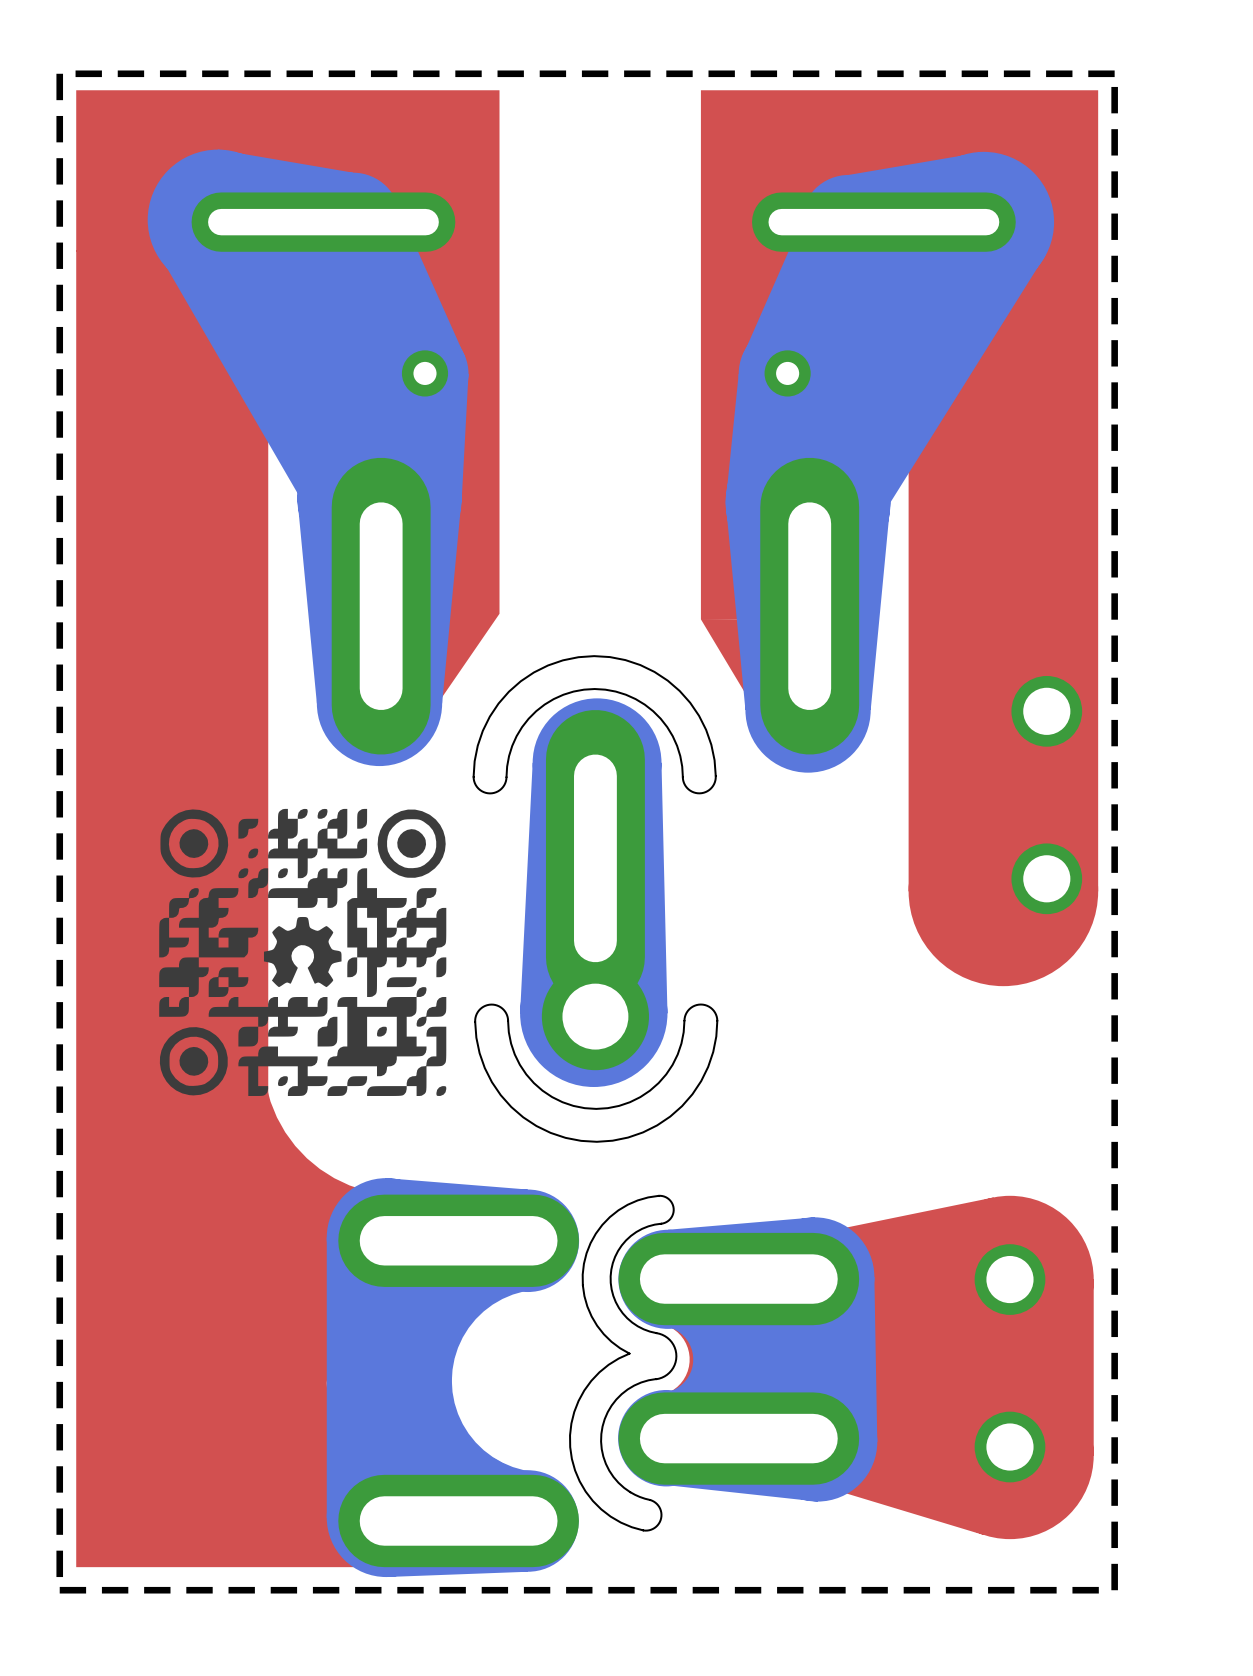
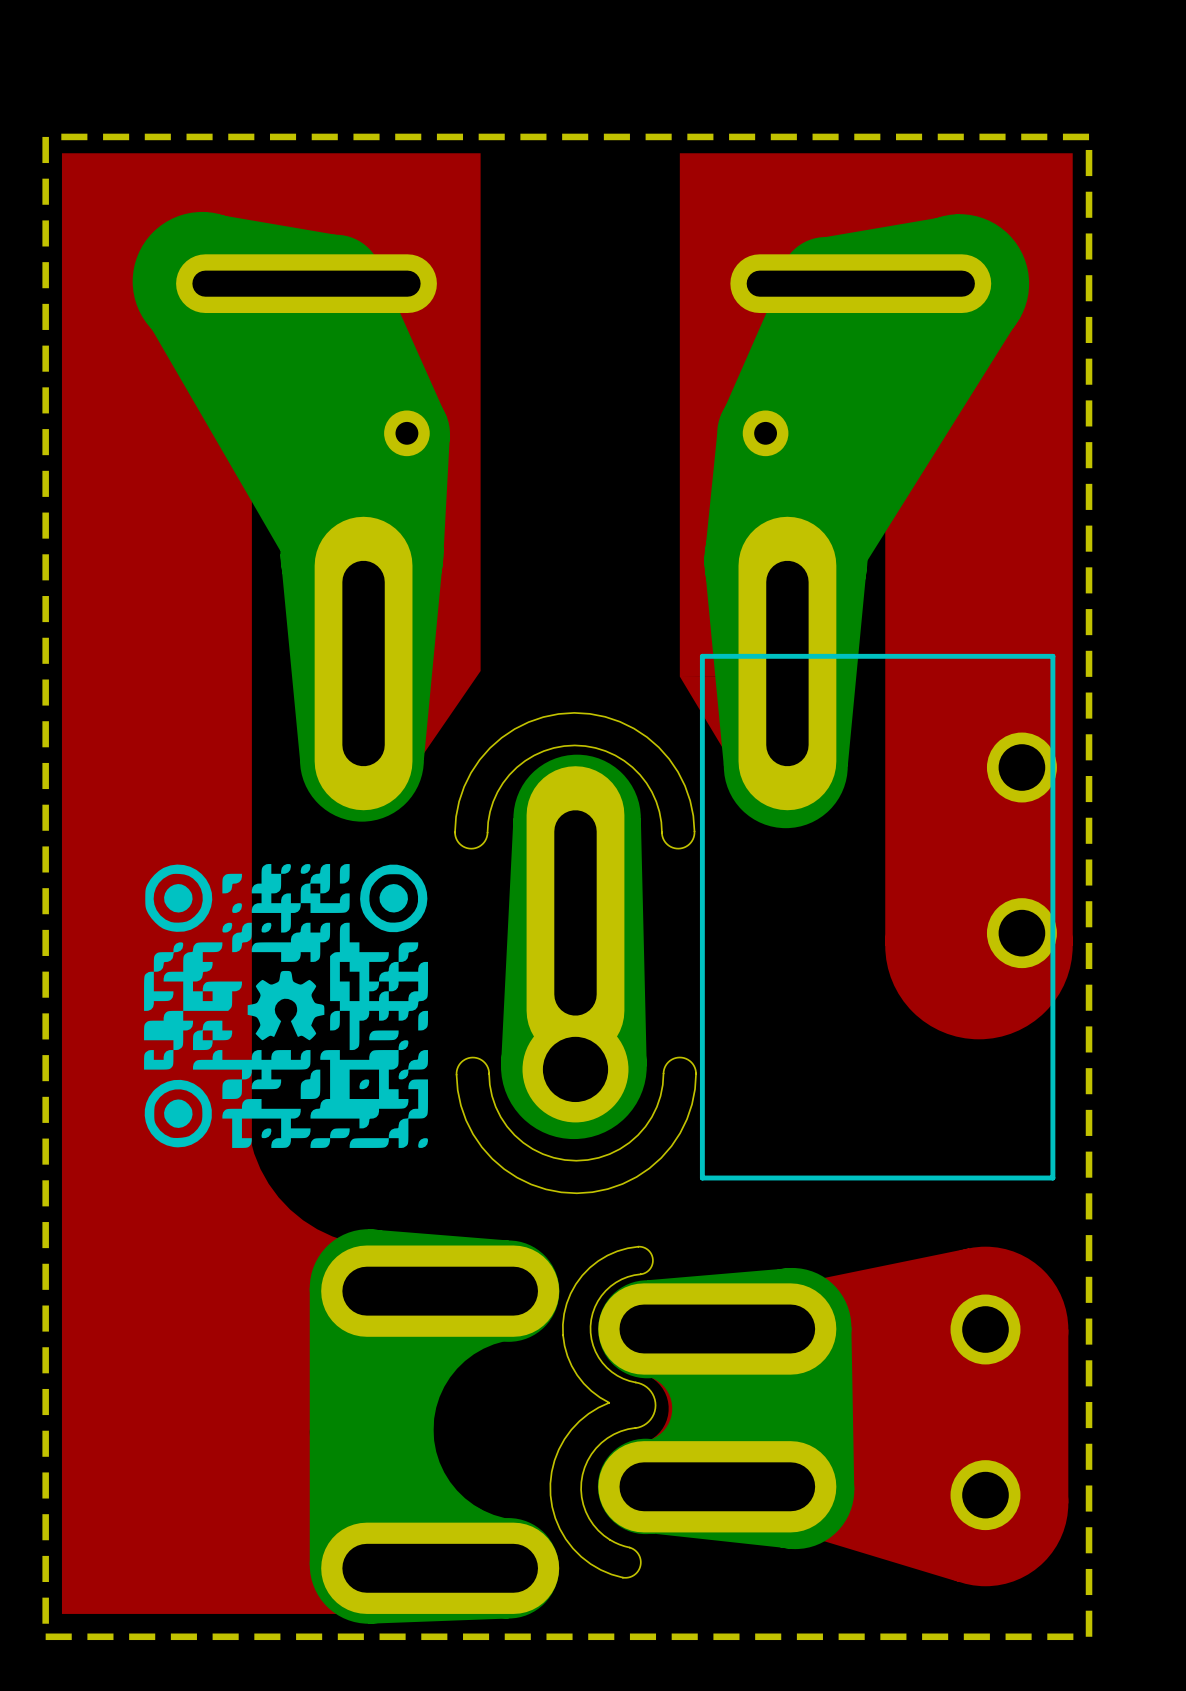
line: none -> (1052, 656) (702, 656) (702, 1178) (1052, 1178) (1052, 656)

